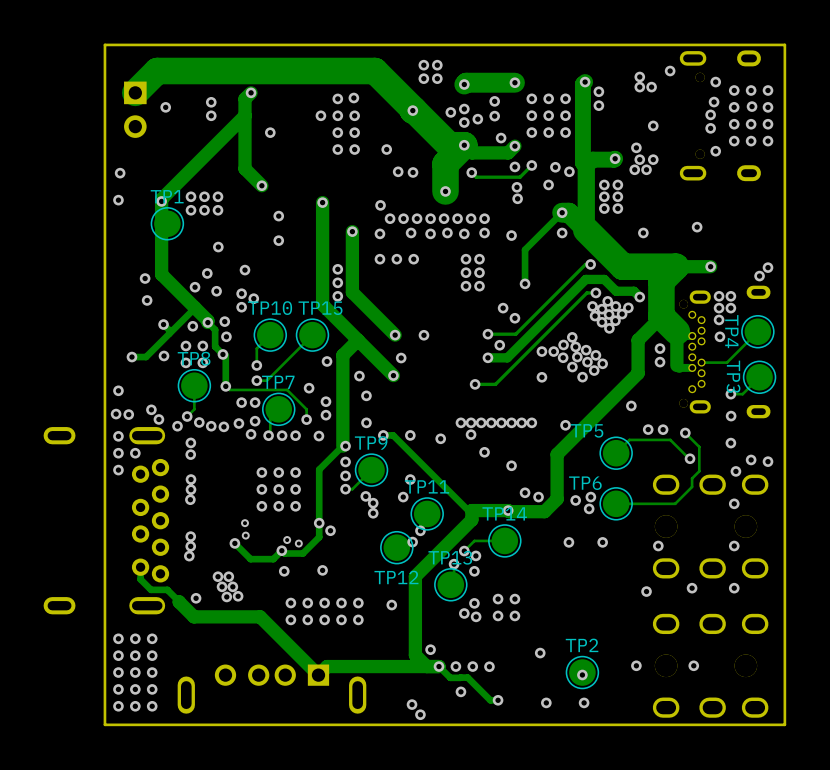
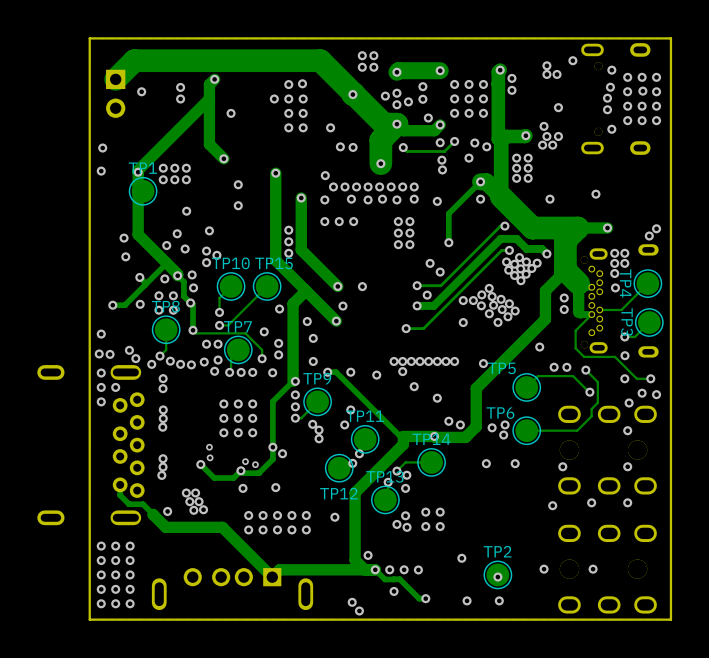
track: none -> (591, 314) (575, 330) (575, 348) (584, 356) (614, 356) (636, 378) (650, 378)
via: none -> (650, 378)

